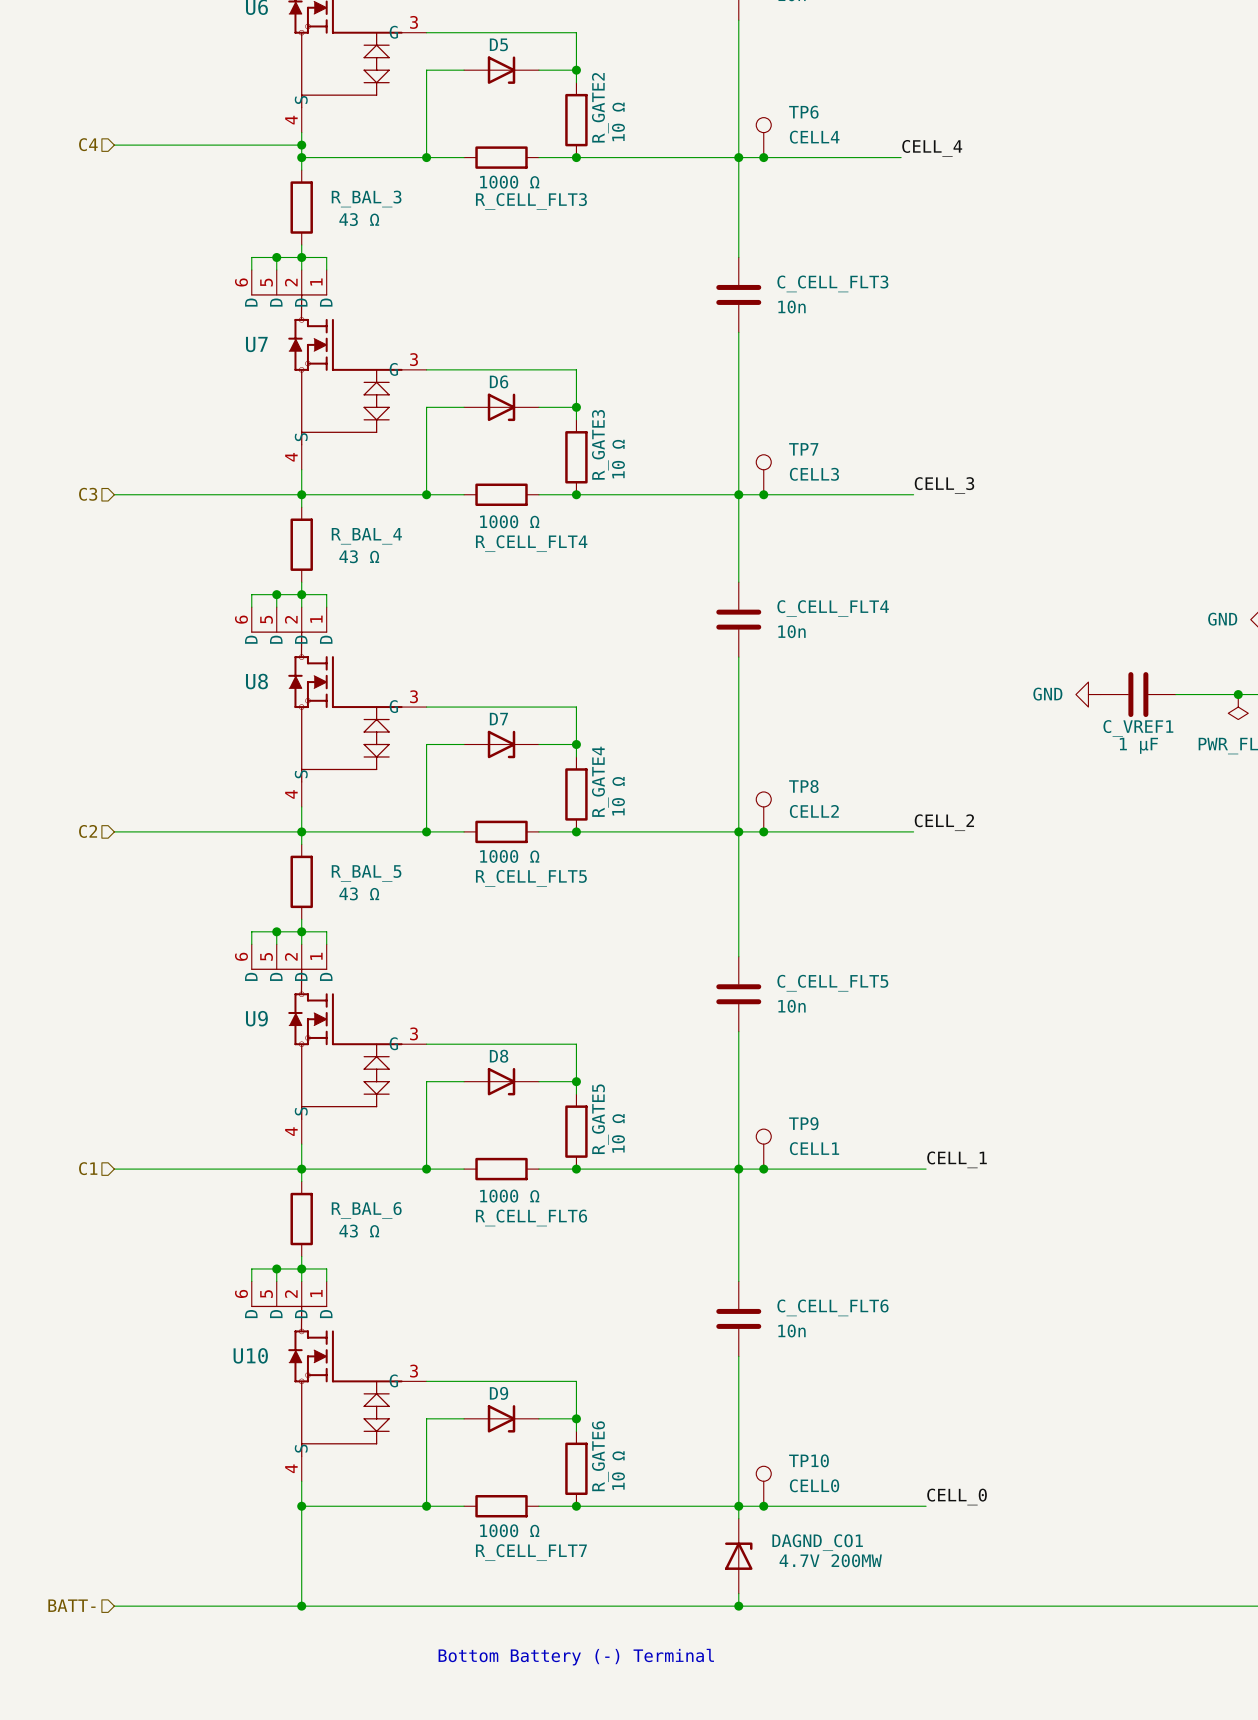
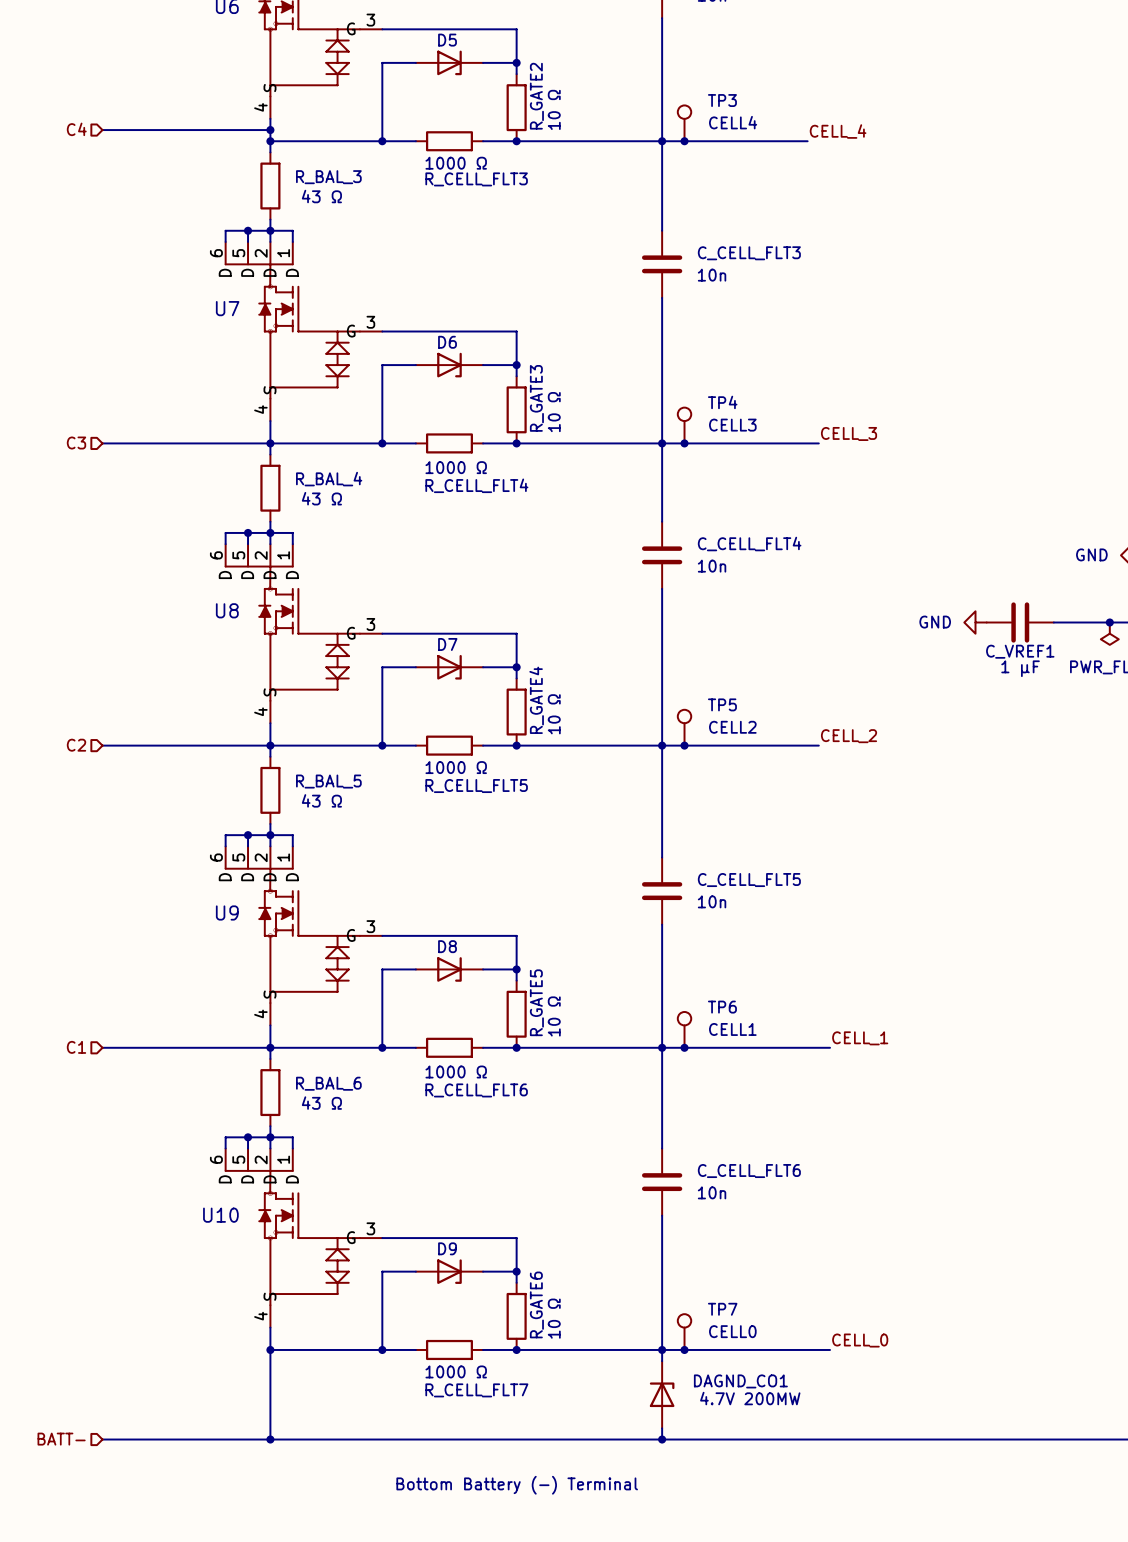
TP6 name: TP6 (803, 112) -> TP3 (722, 100)
TP7 name: TP7 (803, 449) -> TP4 (722, 402)
TP8 name: TP8 (803, 786) -> TP5 (722, 704)
TP9 name: TP9 (803, 1123) -> TP6 (722, 1007)
TP10 name: TP10 (808, 1460) -> TP7 (722, 1309)

